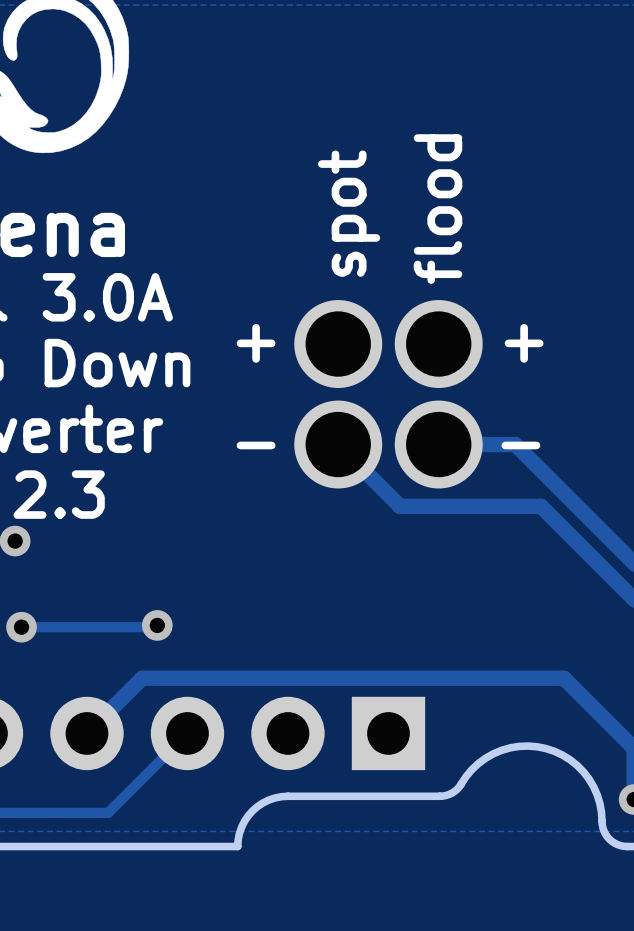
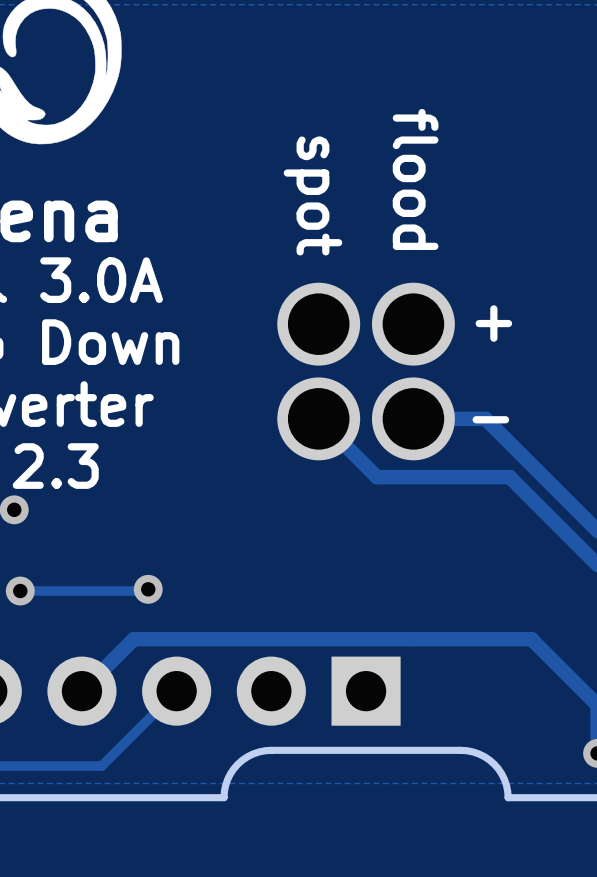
text rotation: 0° (438, 209) -> 180° (415, 179)
text rotation: 0° (349, 213) -> 180° (312, 195)
text: + (256, 343) -> none
text: - (256, 445) -> none
board edge: (461, 784) (478, 763) (501, 750) (528, 746) (554, 751) (577, 765) (589, 779) (599, 803) (605, 833) (614, 843) (627, 846) -> (414, 750) (466, 750) (484, 756) (494, 764) (501, 774) (506, 785) (508, 797) (590, 797)
board edge: (461, 784) (451, 793) (439, 796) -> none

